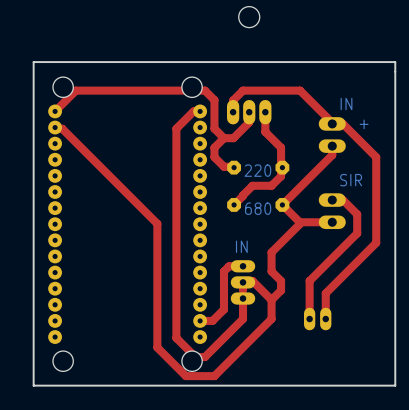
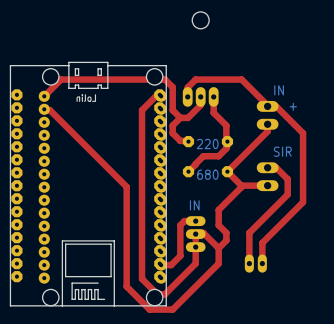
board edge: (395, 62) (395, 385) (33, 385) (33, 62) (395, 62) -> none
part: none -> (88, 184)

